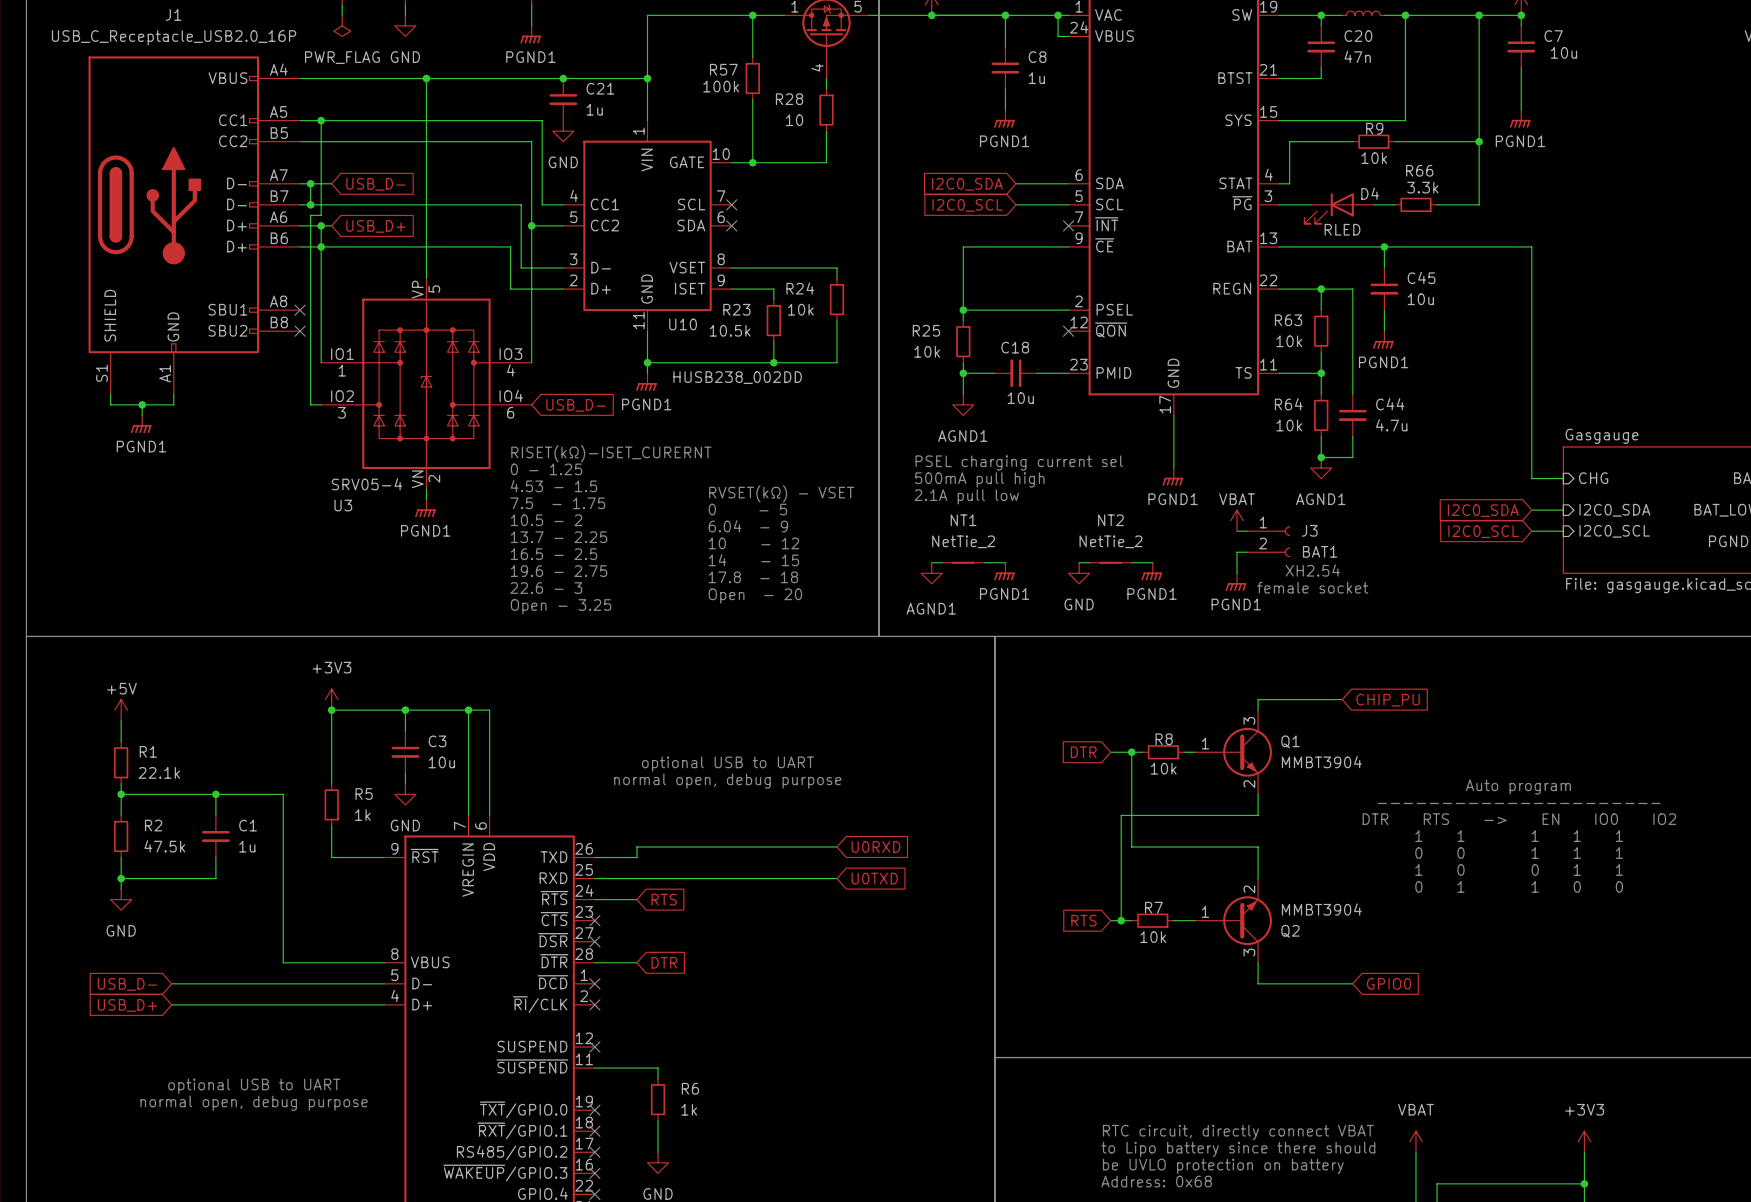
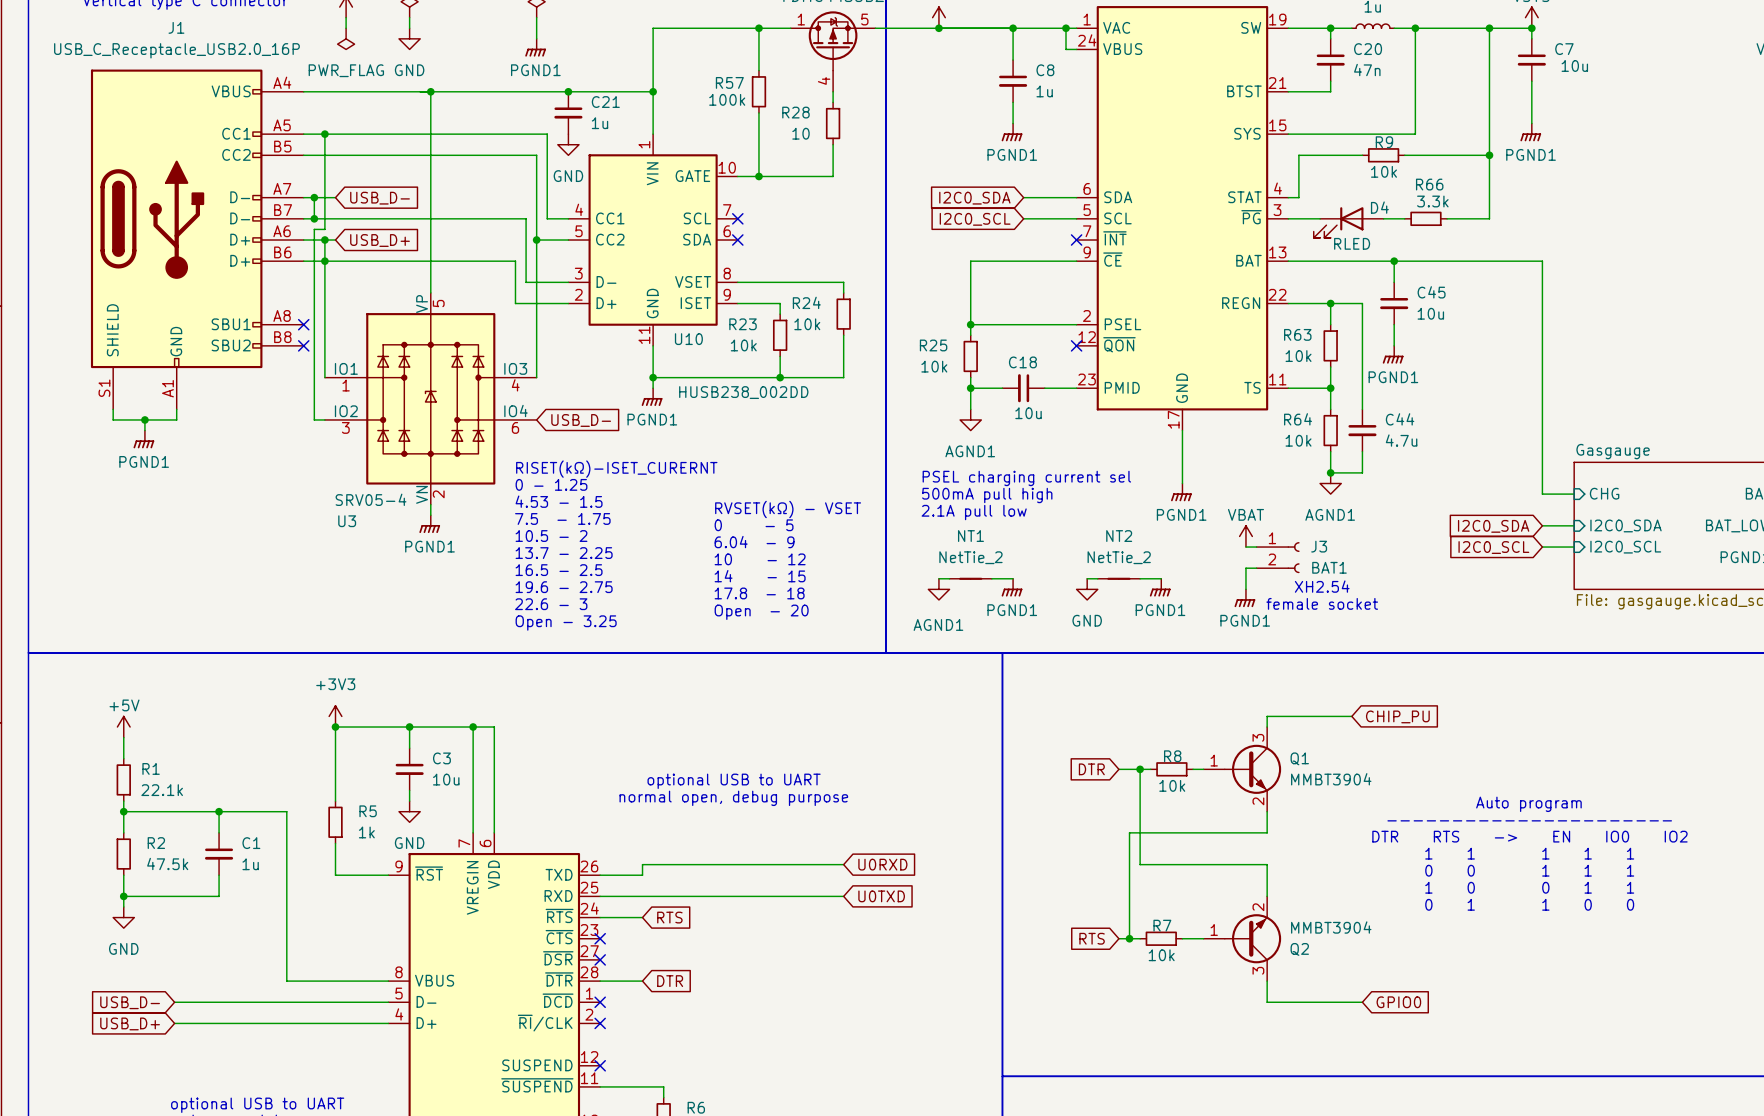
R23 value: 10.5k (730, 330) -> 10k (743, 345)

